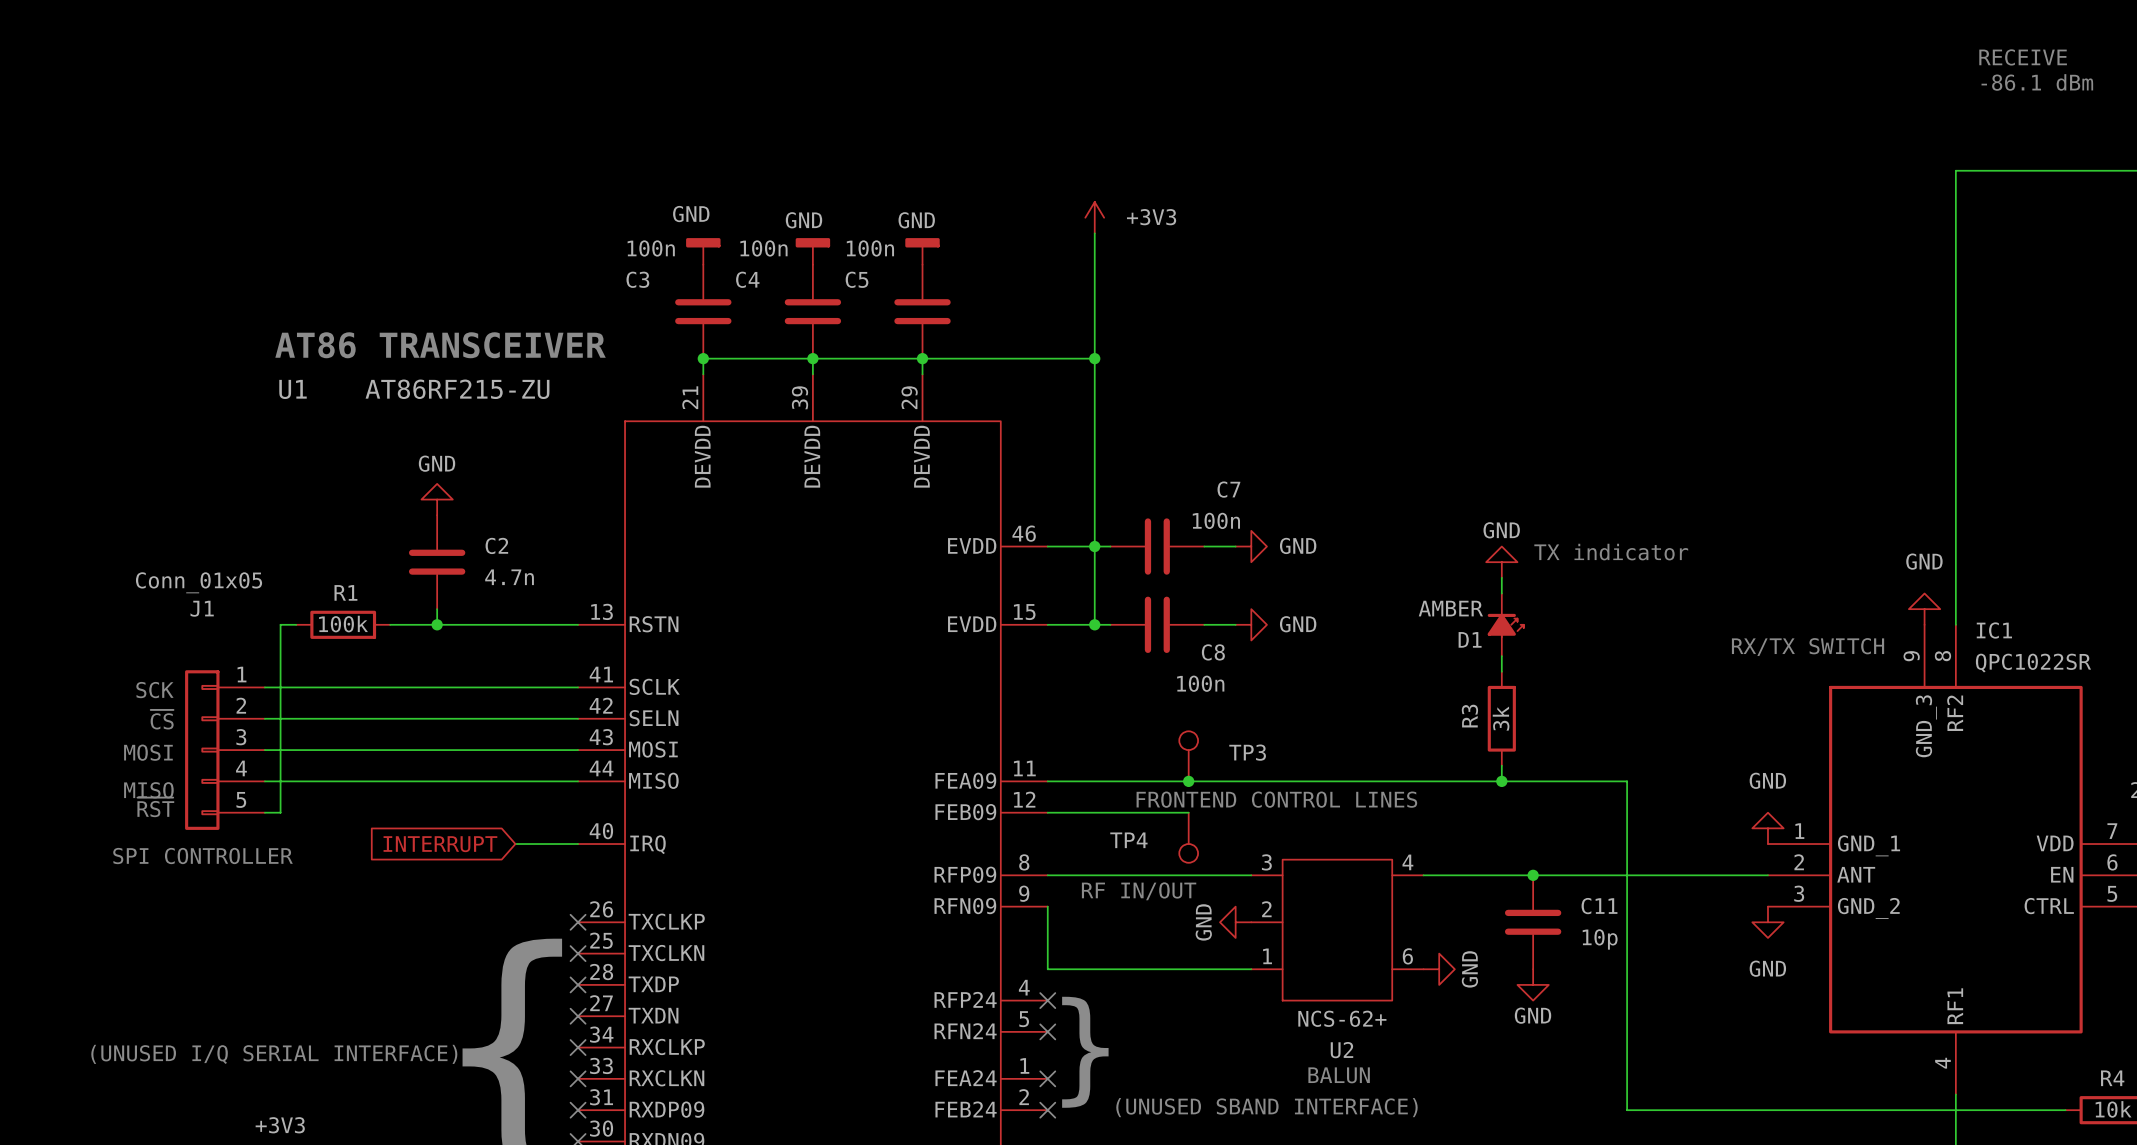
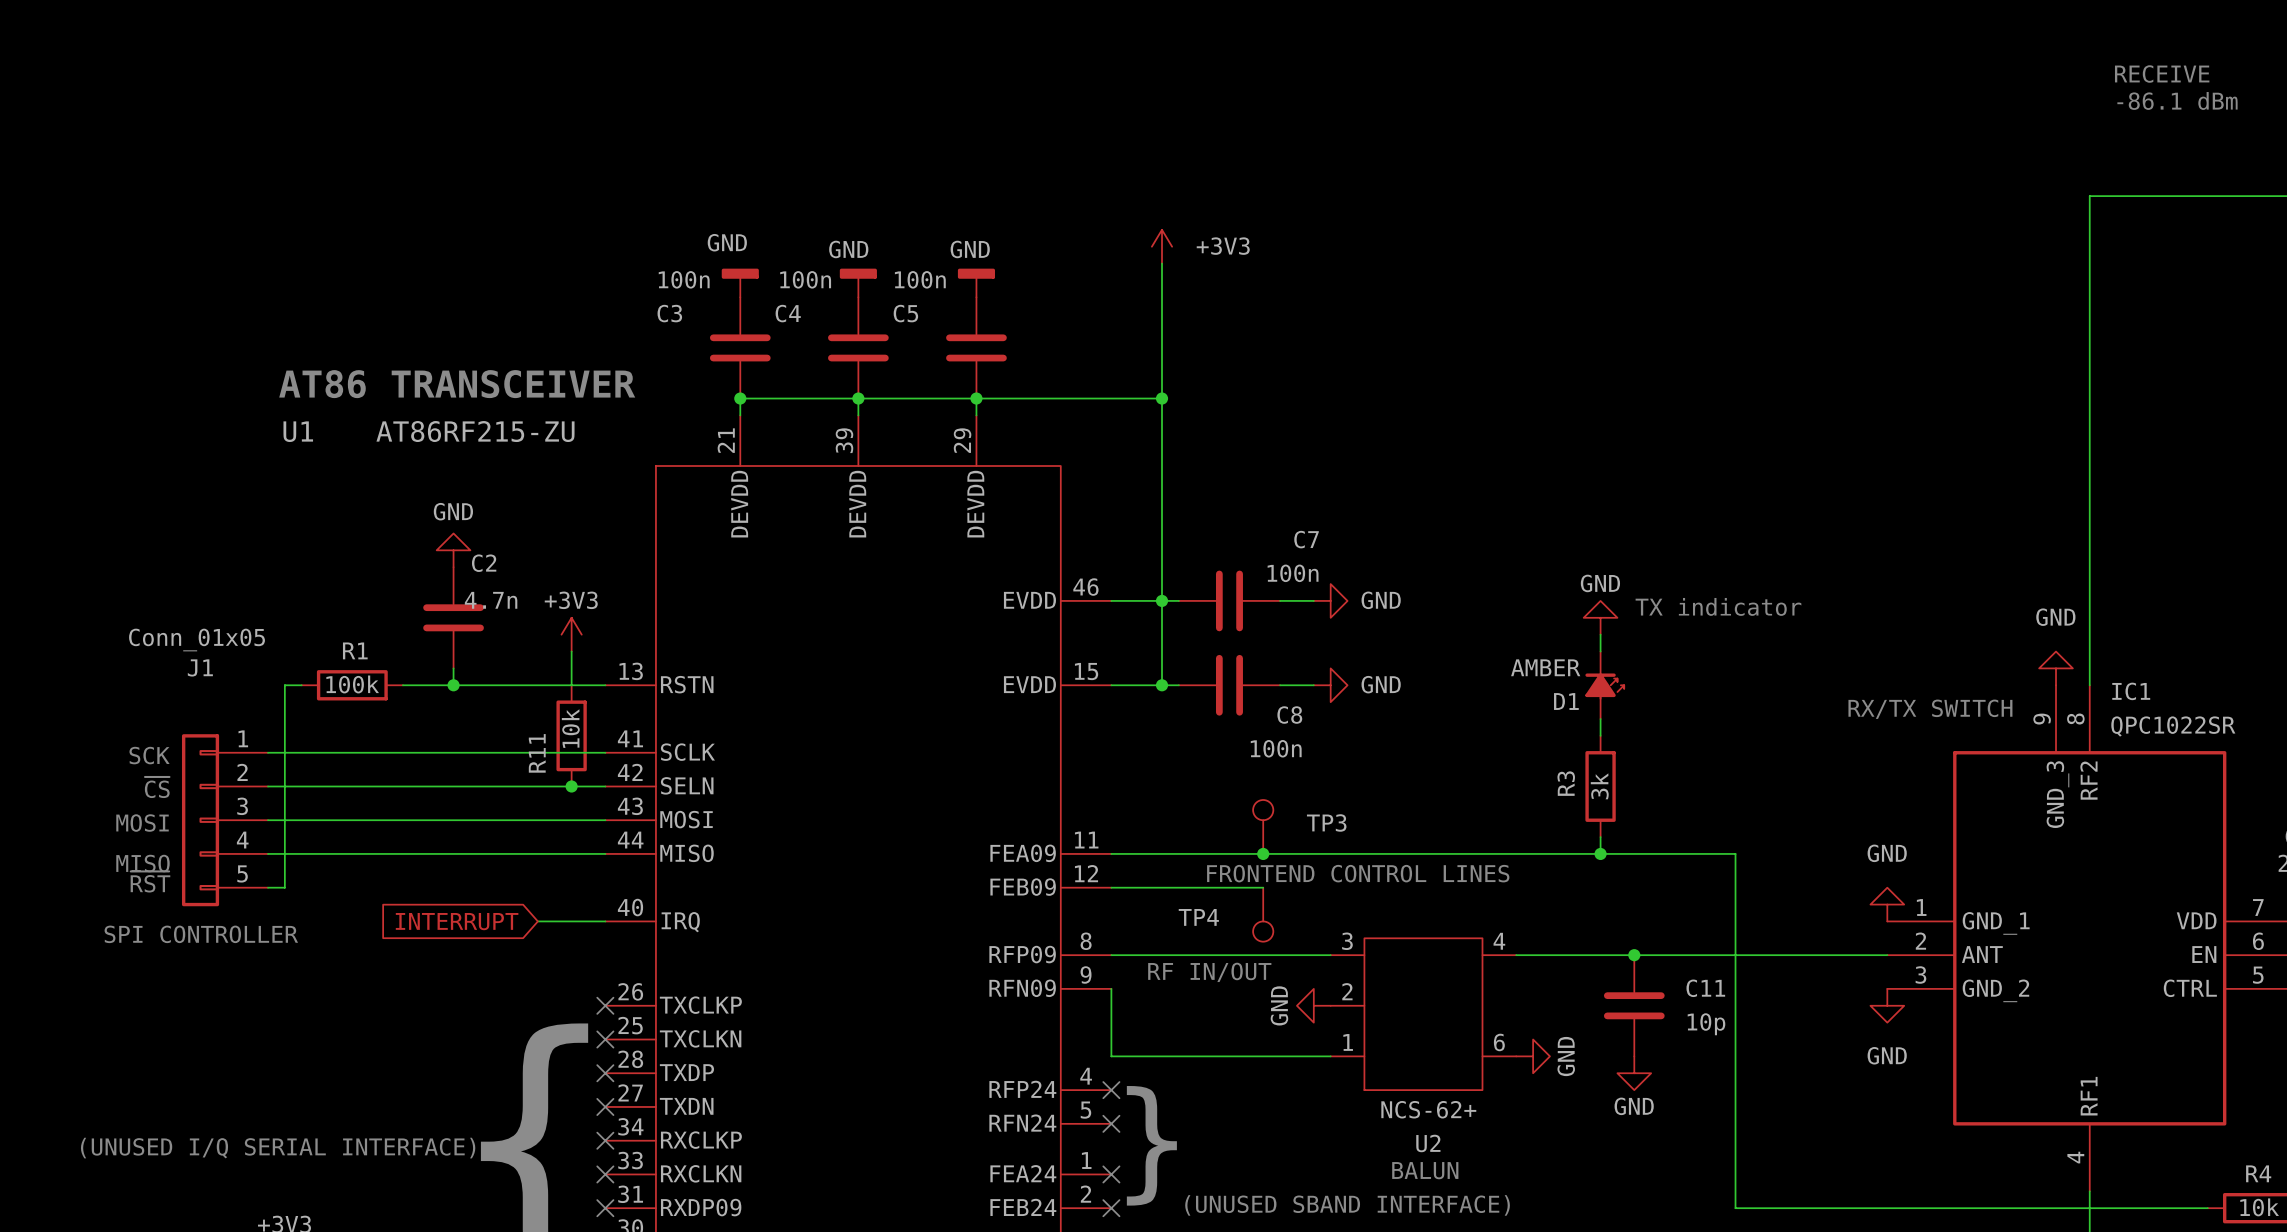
C2 name position: C2 (496, 545) -> C2 (484, 563)
C2 value position: 4.7n (509, 577) -> 4.7n (491, 600)
power symbol: none -> +3V3 (571, 634)
wire: none -> (571, 651) (571, 685)
R11: none -> 10k (571, 735)
junction: none -> (571, 786)

